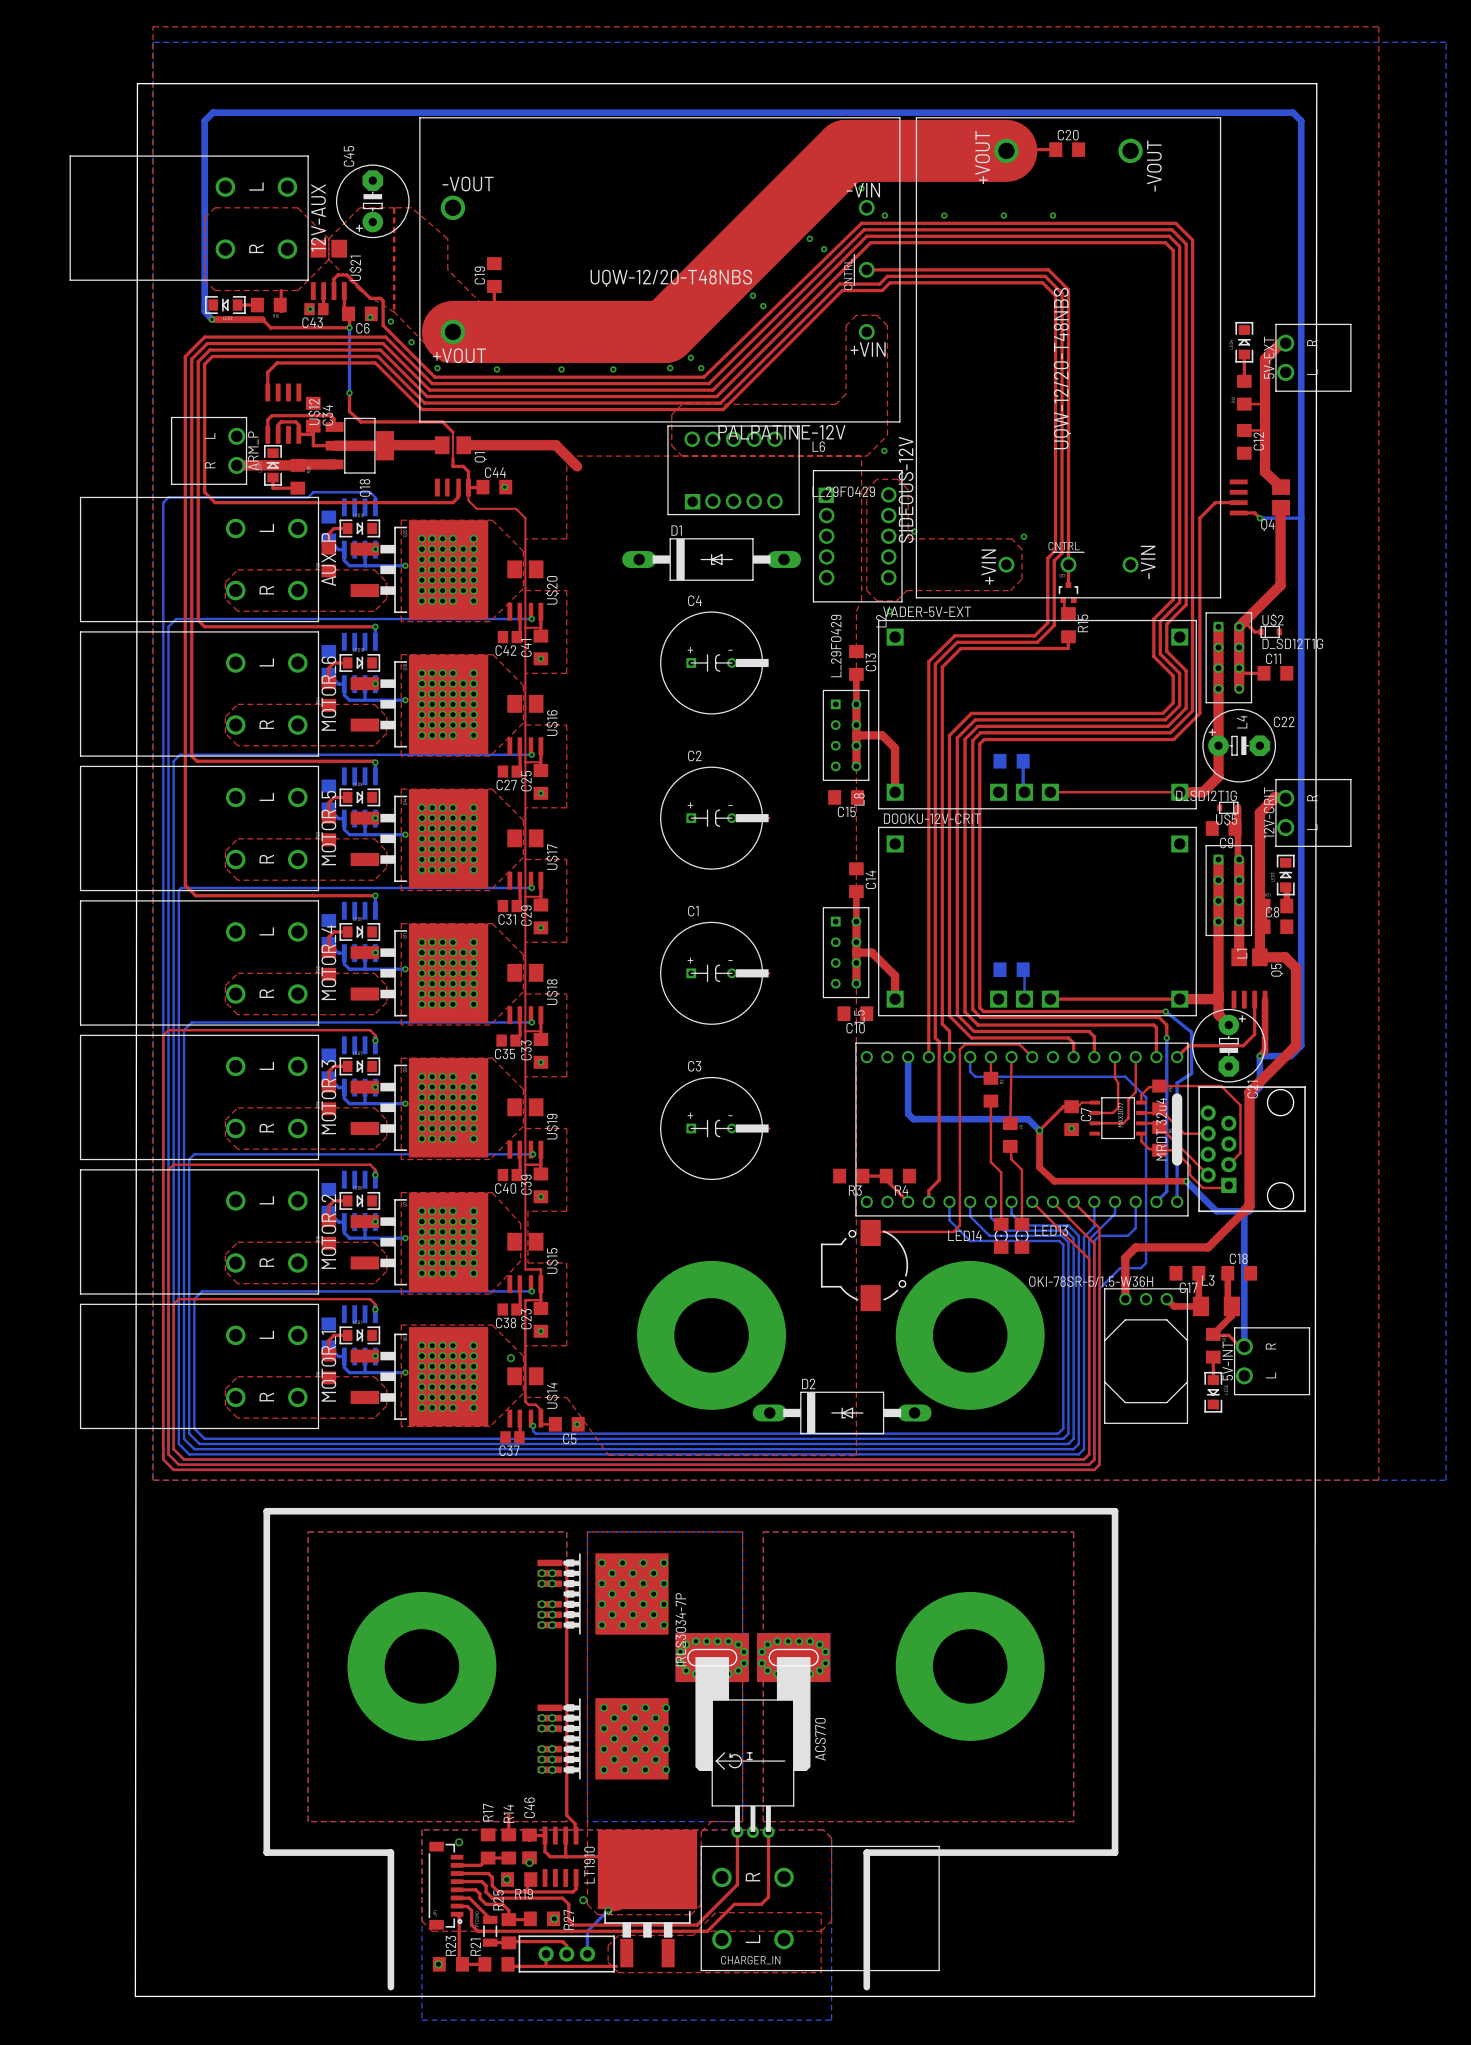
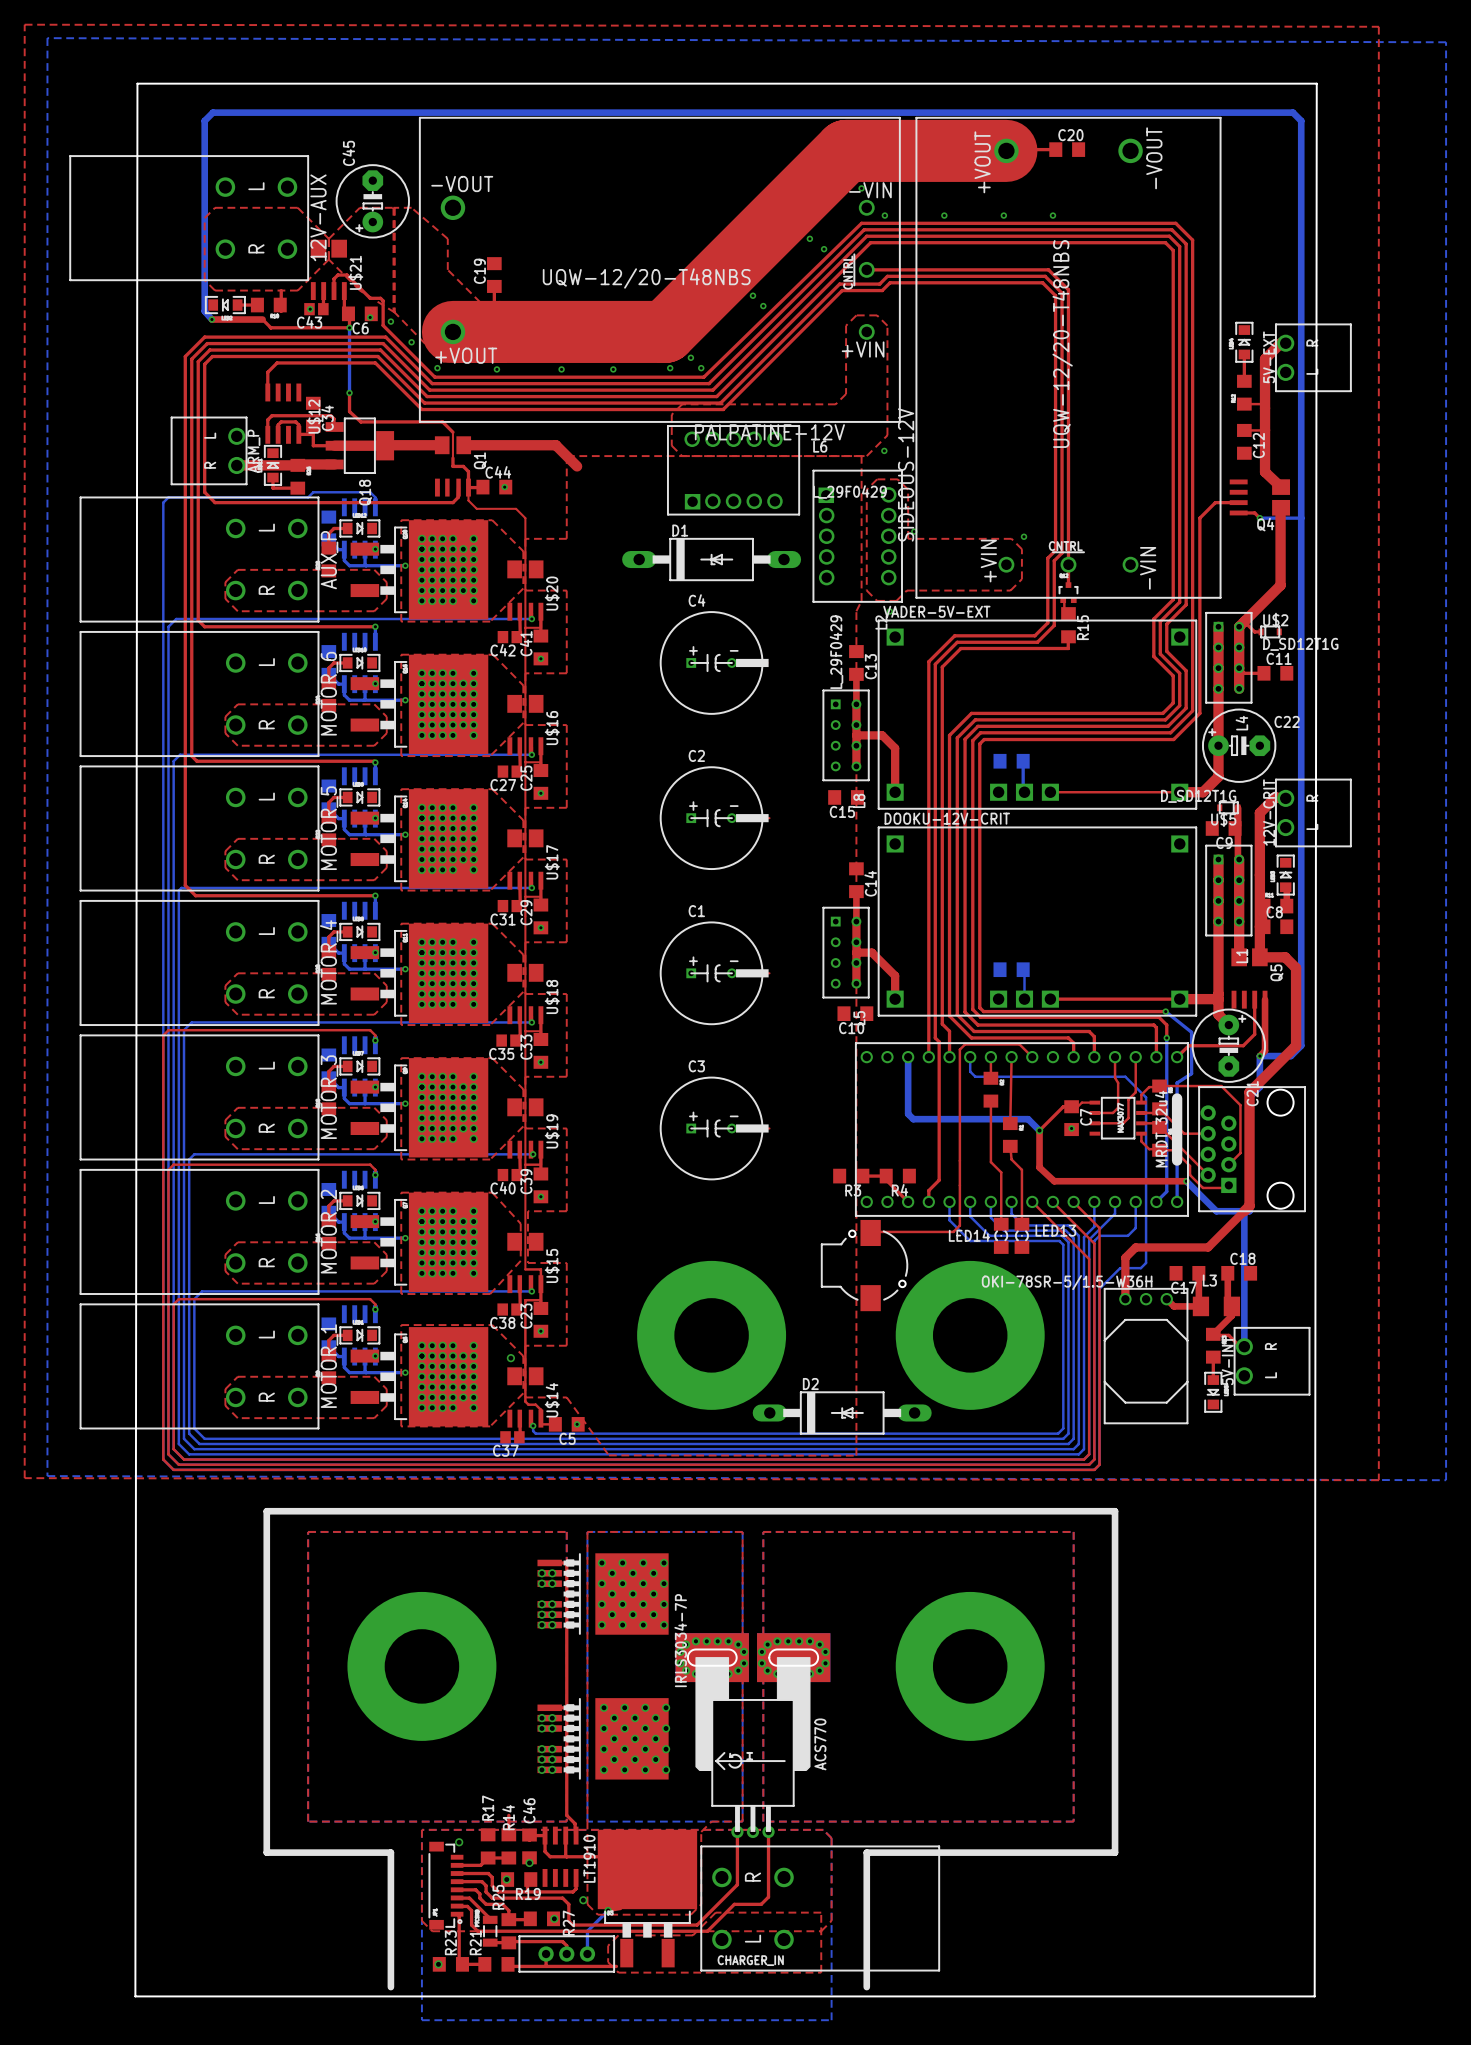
top zone outline: (1378, 26) (152, 26) (152, 1480) (1378, 1480) -> (1378, 26) (24, 24) (24, 1478) (1378, 1480)
bottom zone outline: (1446, 42) (152, 42) (152, 1480) (1446, 1480) -> (1446, 42) (47, 38) (47, 1476) (1446, 1480)

